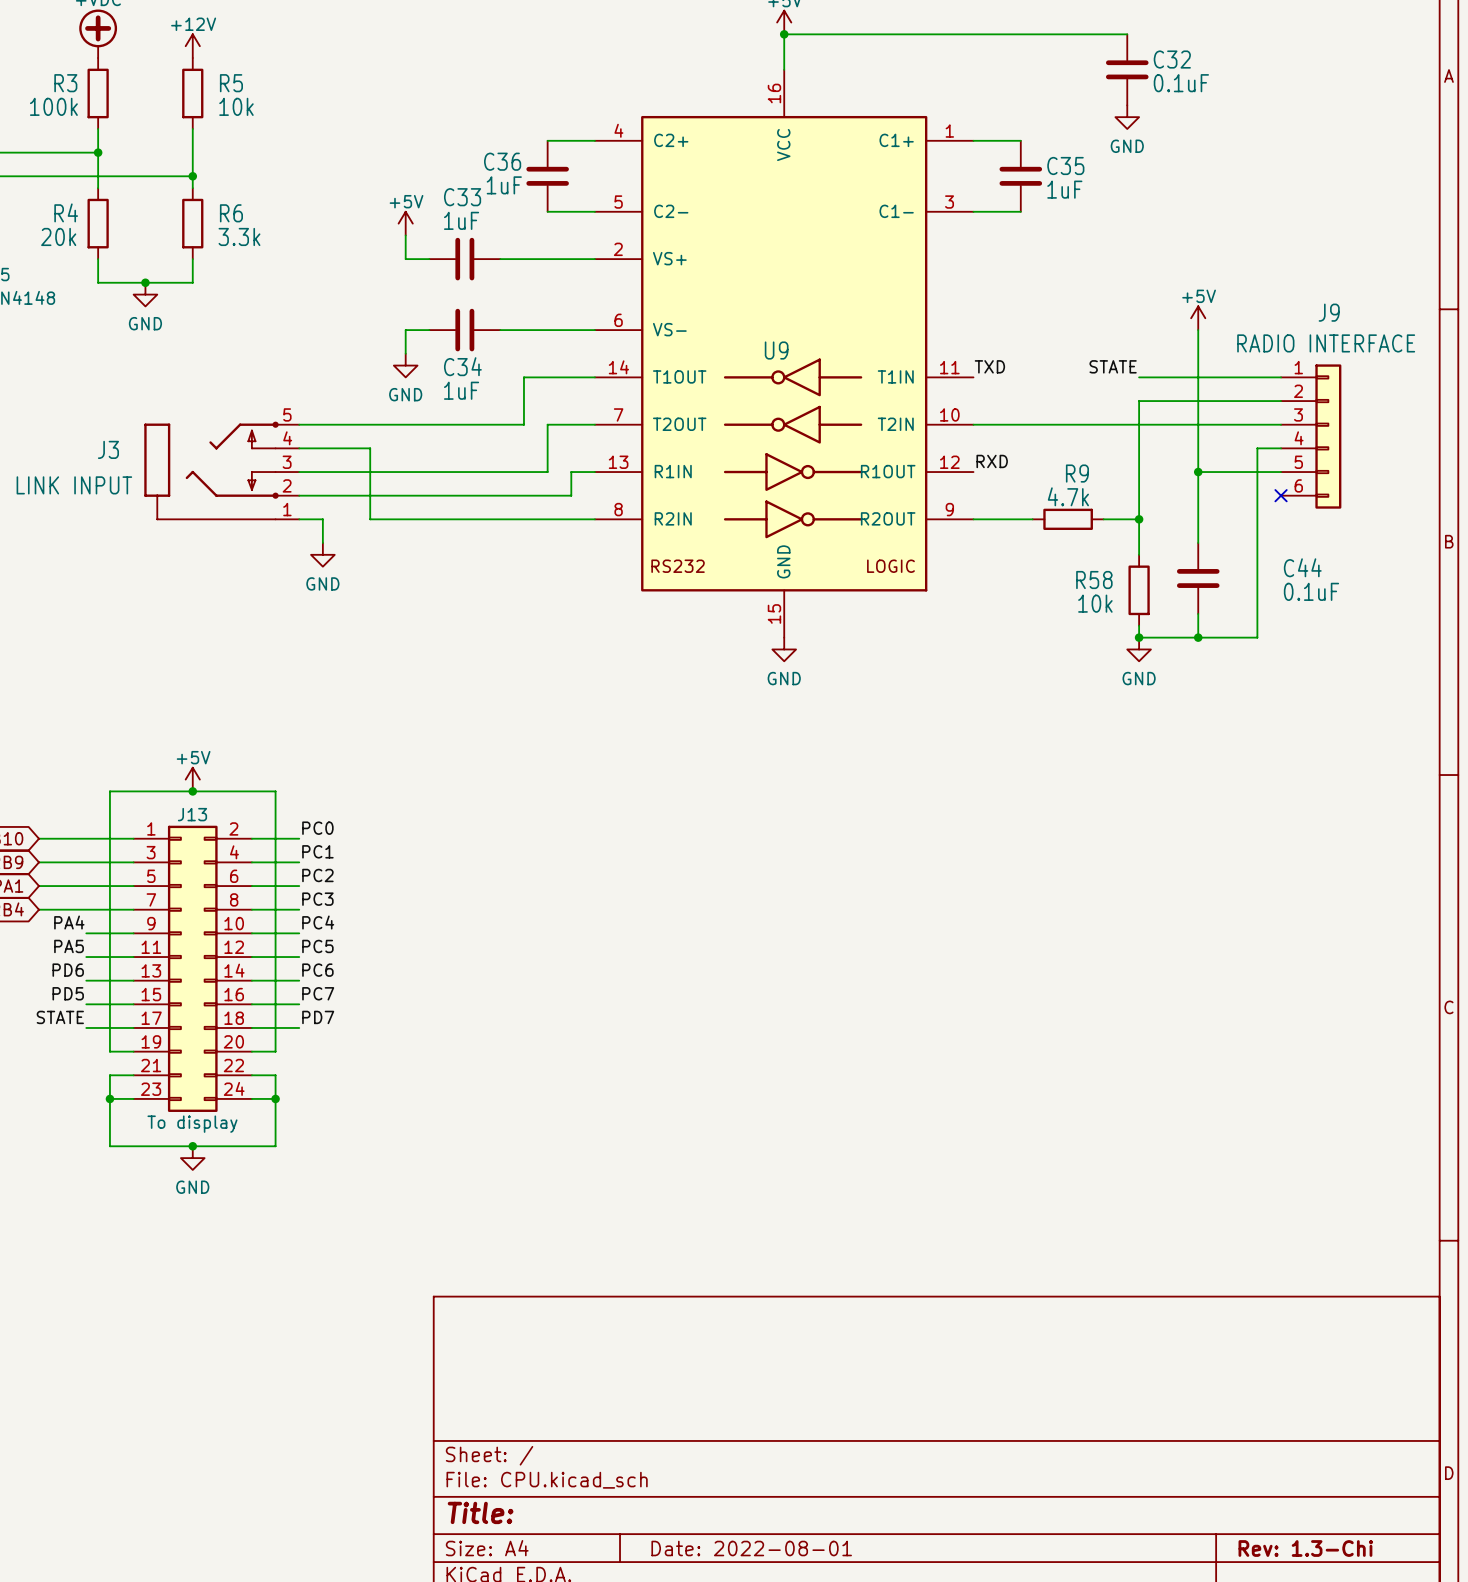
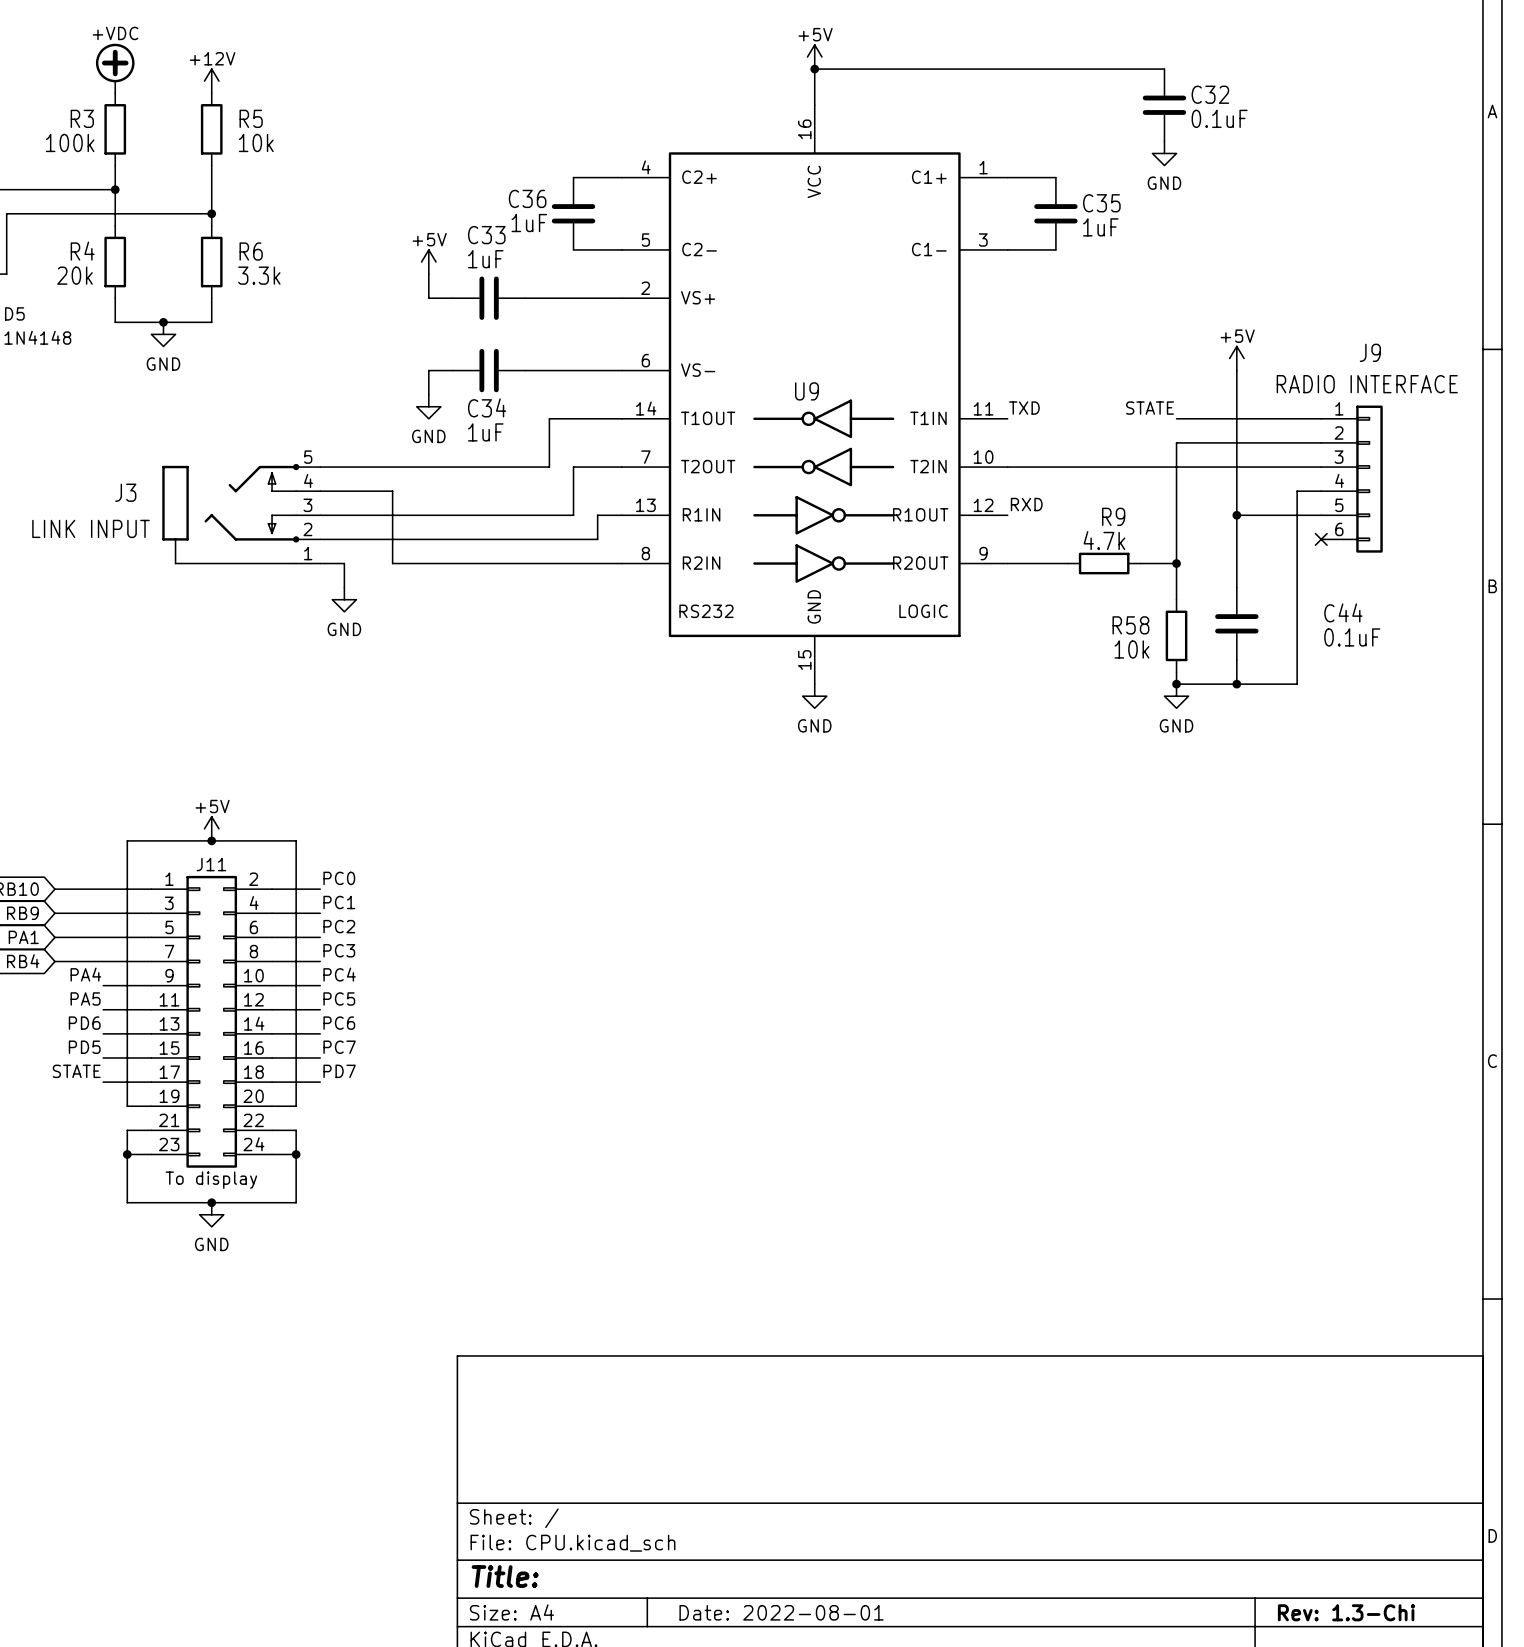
J13 name: J13 (192, 814) -> J11 (211, 864)

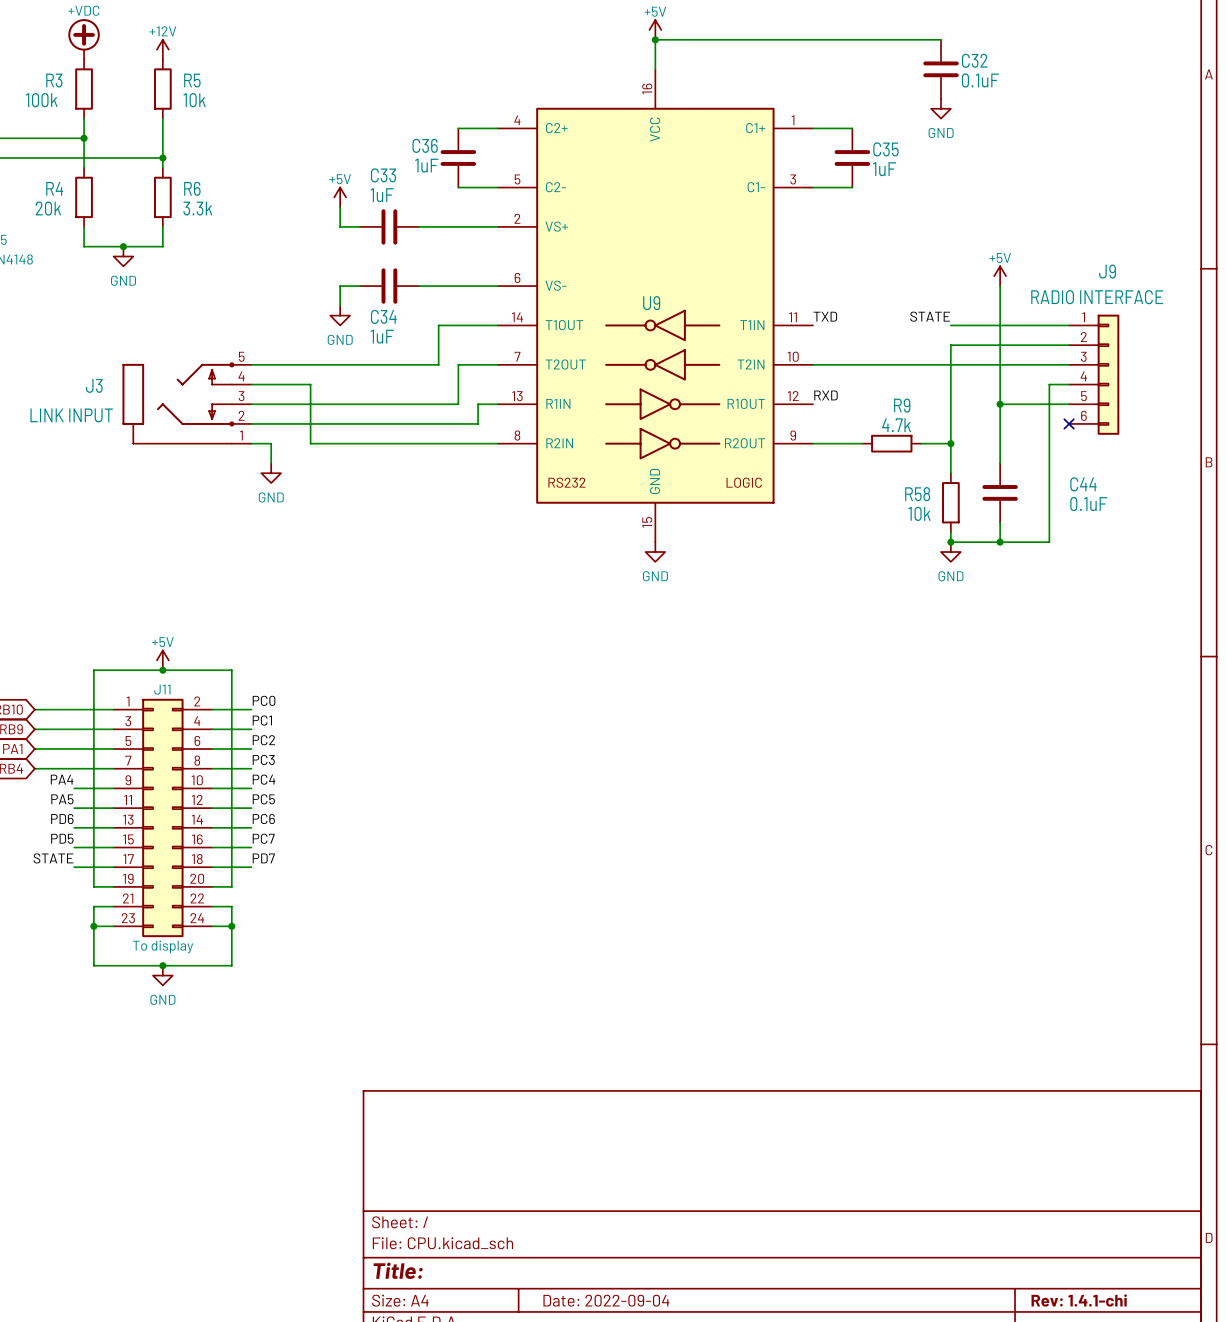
title block: Date: 2022-08-01 (781, 1612) -> Date: 2022-09-04 (606, 1300)
title block: Rev: 1.3-Chi (1346, 1612) -> Rev: 1.4.1-chi (1079, 1300)

